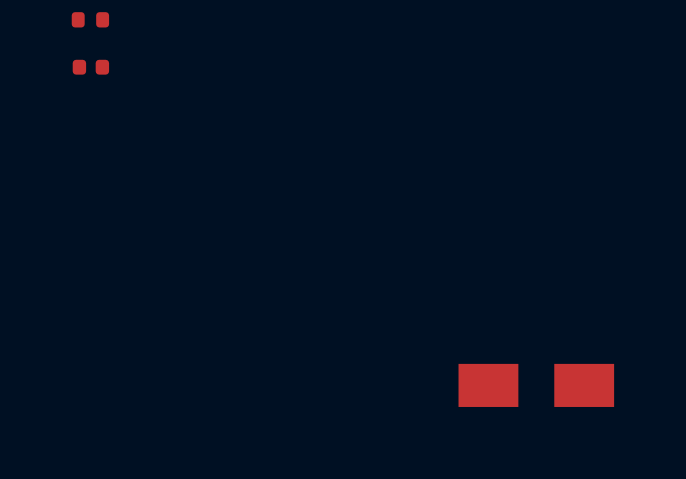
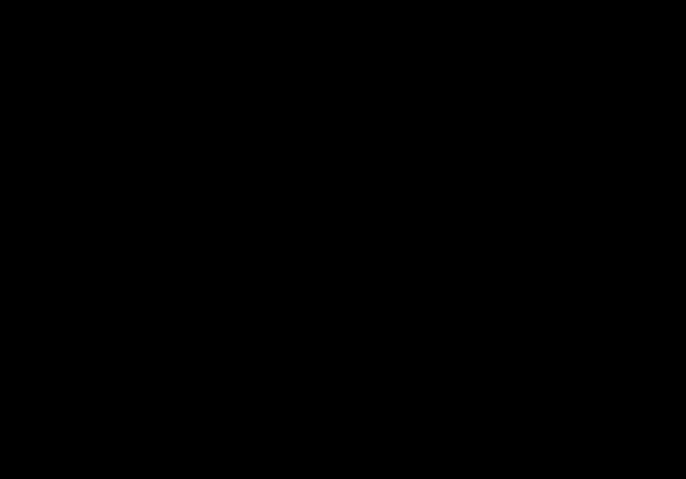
part: (90, 19) -> none
part: (90, 67) -> none
part: (536, 385) -> none

